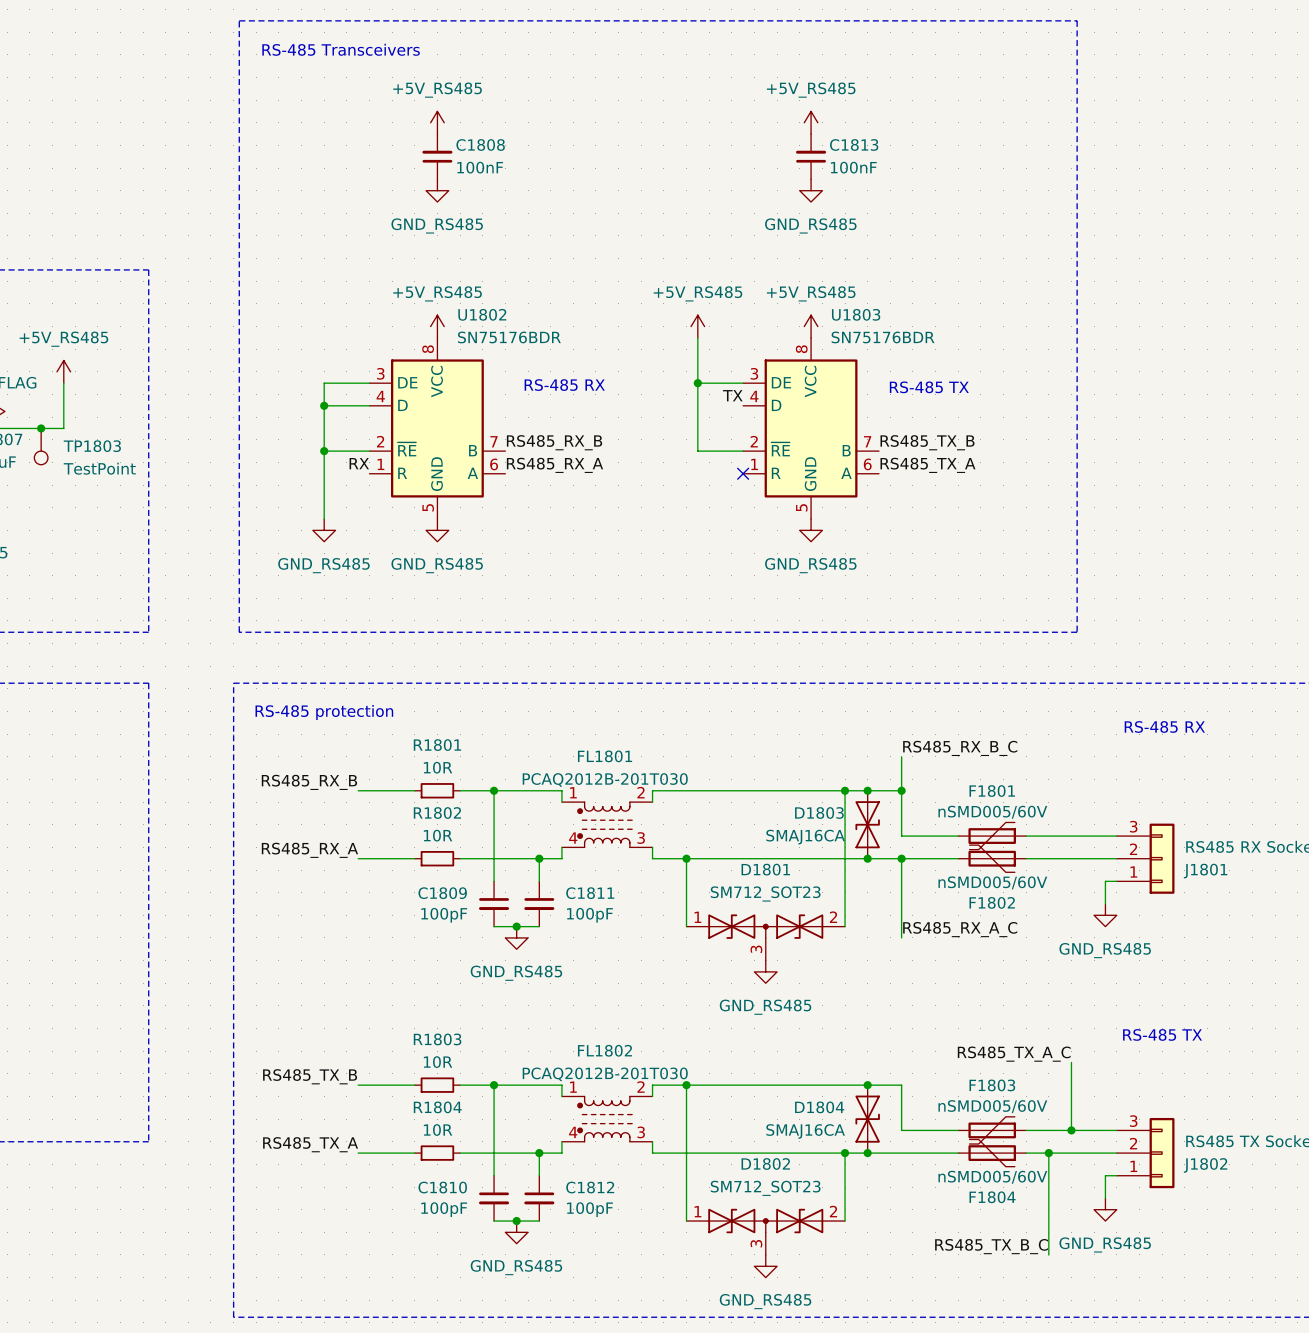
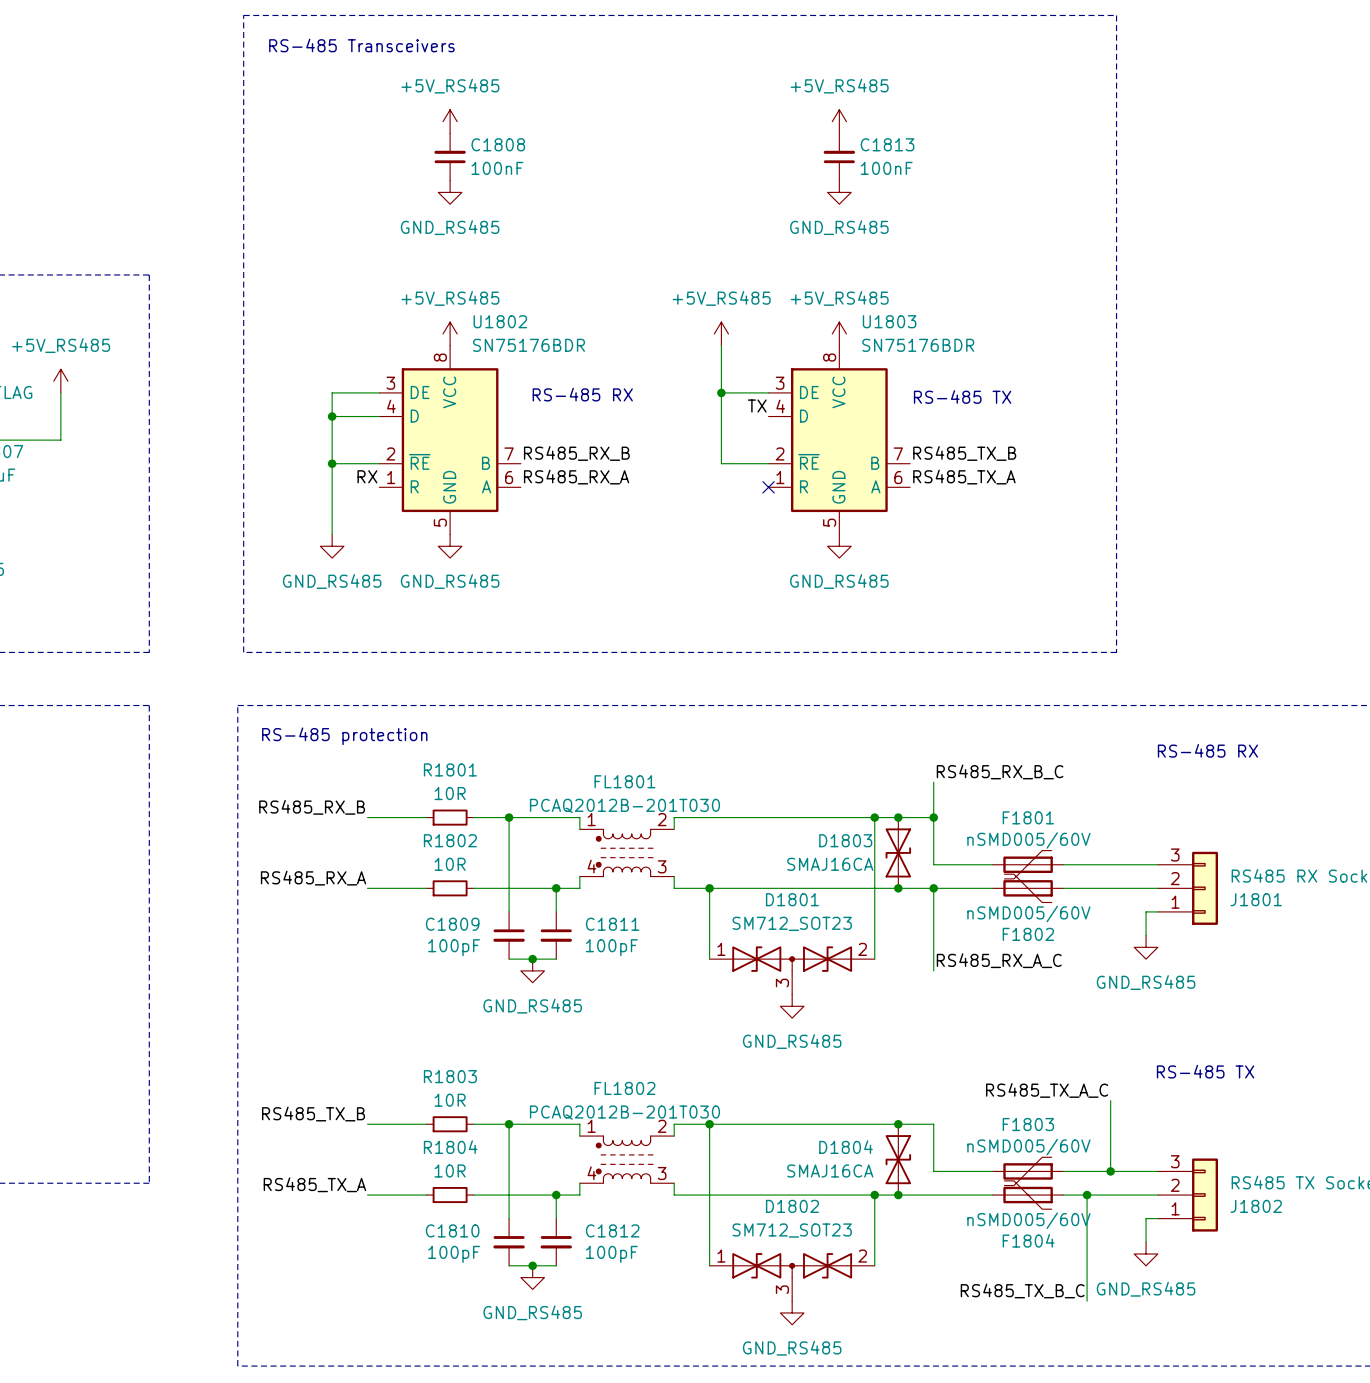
junction: (41, 428) -> none
TP1803: TestPoint (41, 446) -> none

